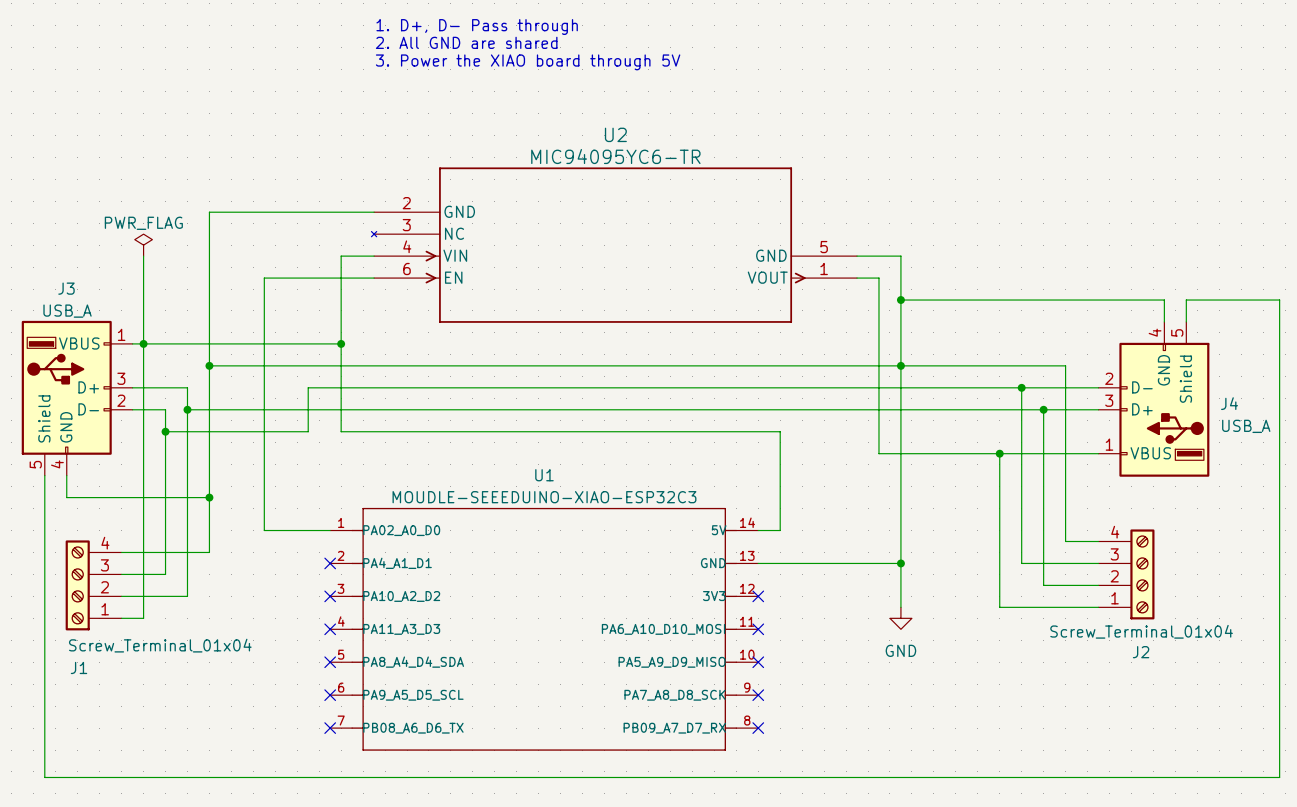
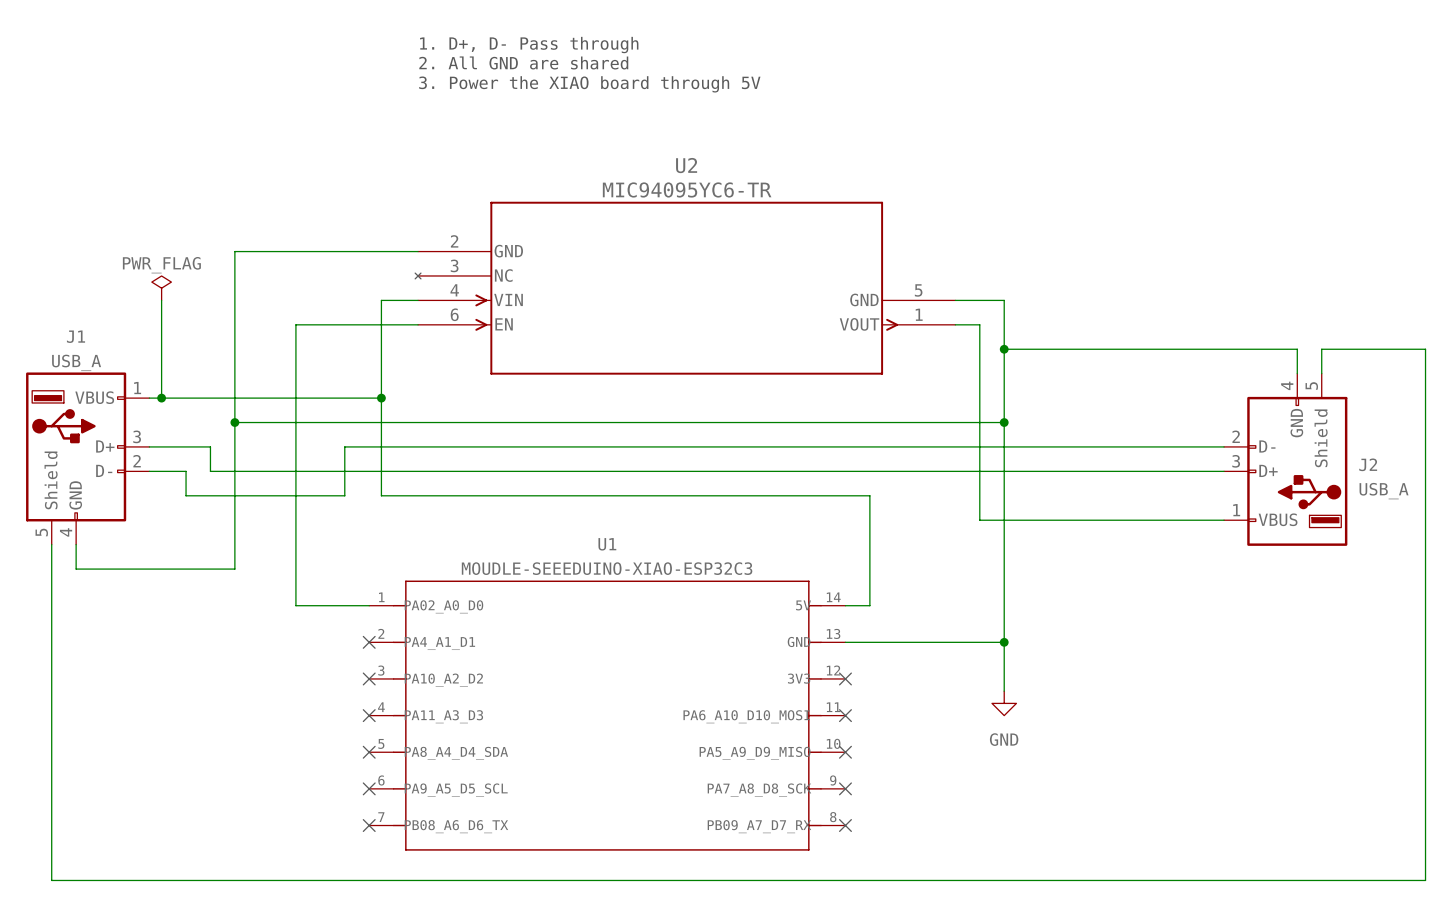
J3 name: J3 (66, 288) -> J1 (76, 336)
wire: (143, 343) (143, 618) (121, 618) -> none
wire: (900, 365) (1065, 365) (1065, 541) (1098, 541) -> none
wire: (1021, 387) (1021, 563) (1098, 563) -> none
junction: (1021, 387) -> none
J4 name: J4 (1229, 403) -> J2 (1368, 464)
wire: (187, 409) (187, 596) (121, 596) -> none
junction: (187, 409) -> none
wire: (1043, 409) (1043, 585) (1098, 585) -> none
junction: (1043, 409) -> none
wire: (165, 431) (165, 574) (121, 574) -> none
junction: (165, 431) -> none
wire: (999, 453) (999, 607) (1098, 607) -> none
junction: (999, 453) -> none
wire: (209, 497) (209, 552) (121, 552) -> none
junction: (209, 497) -> none
J2: Screw_Terminal_01x04 (1126, 574) -> none
J1: Screw_Terminal_01x04 (93, 585) -> none

